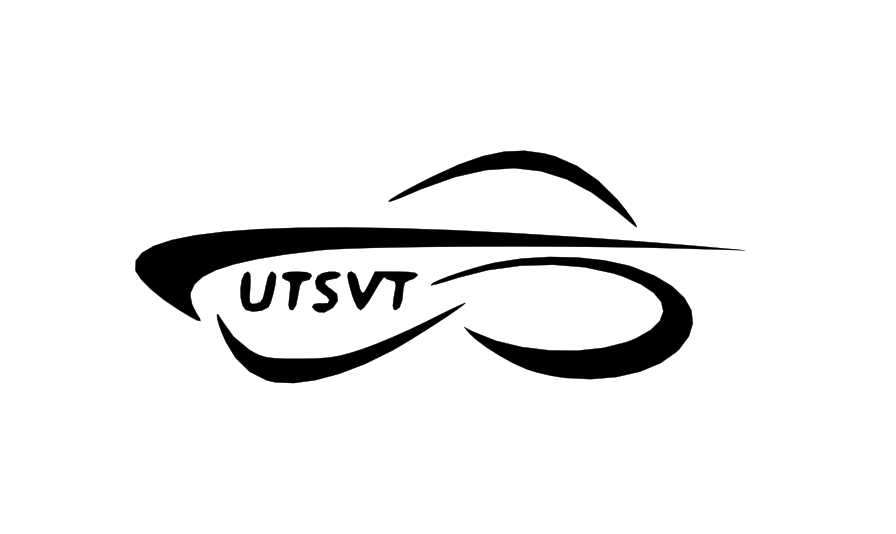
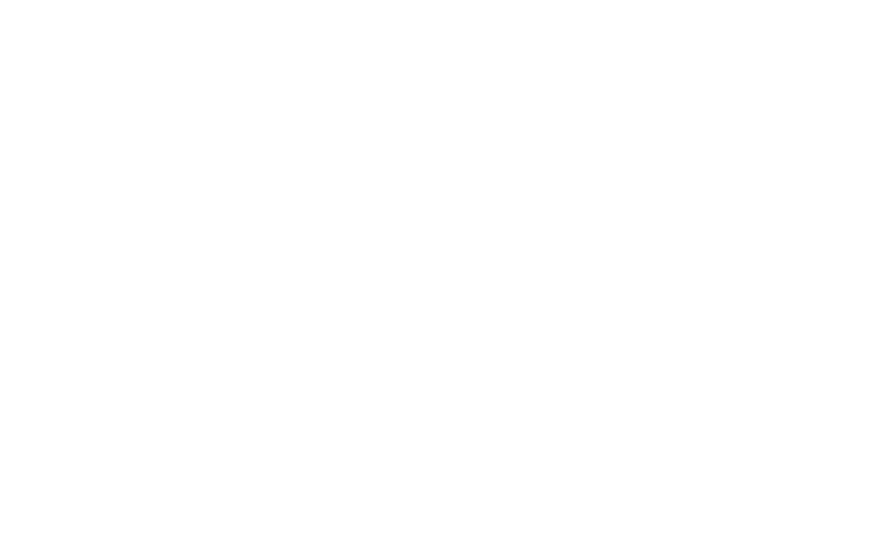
drawing: [135, 150, 746, 384] -> none

